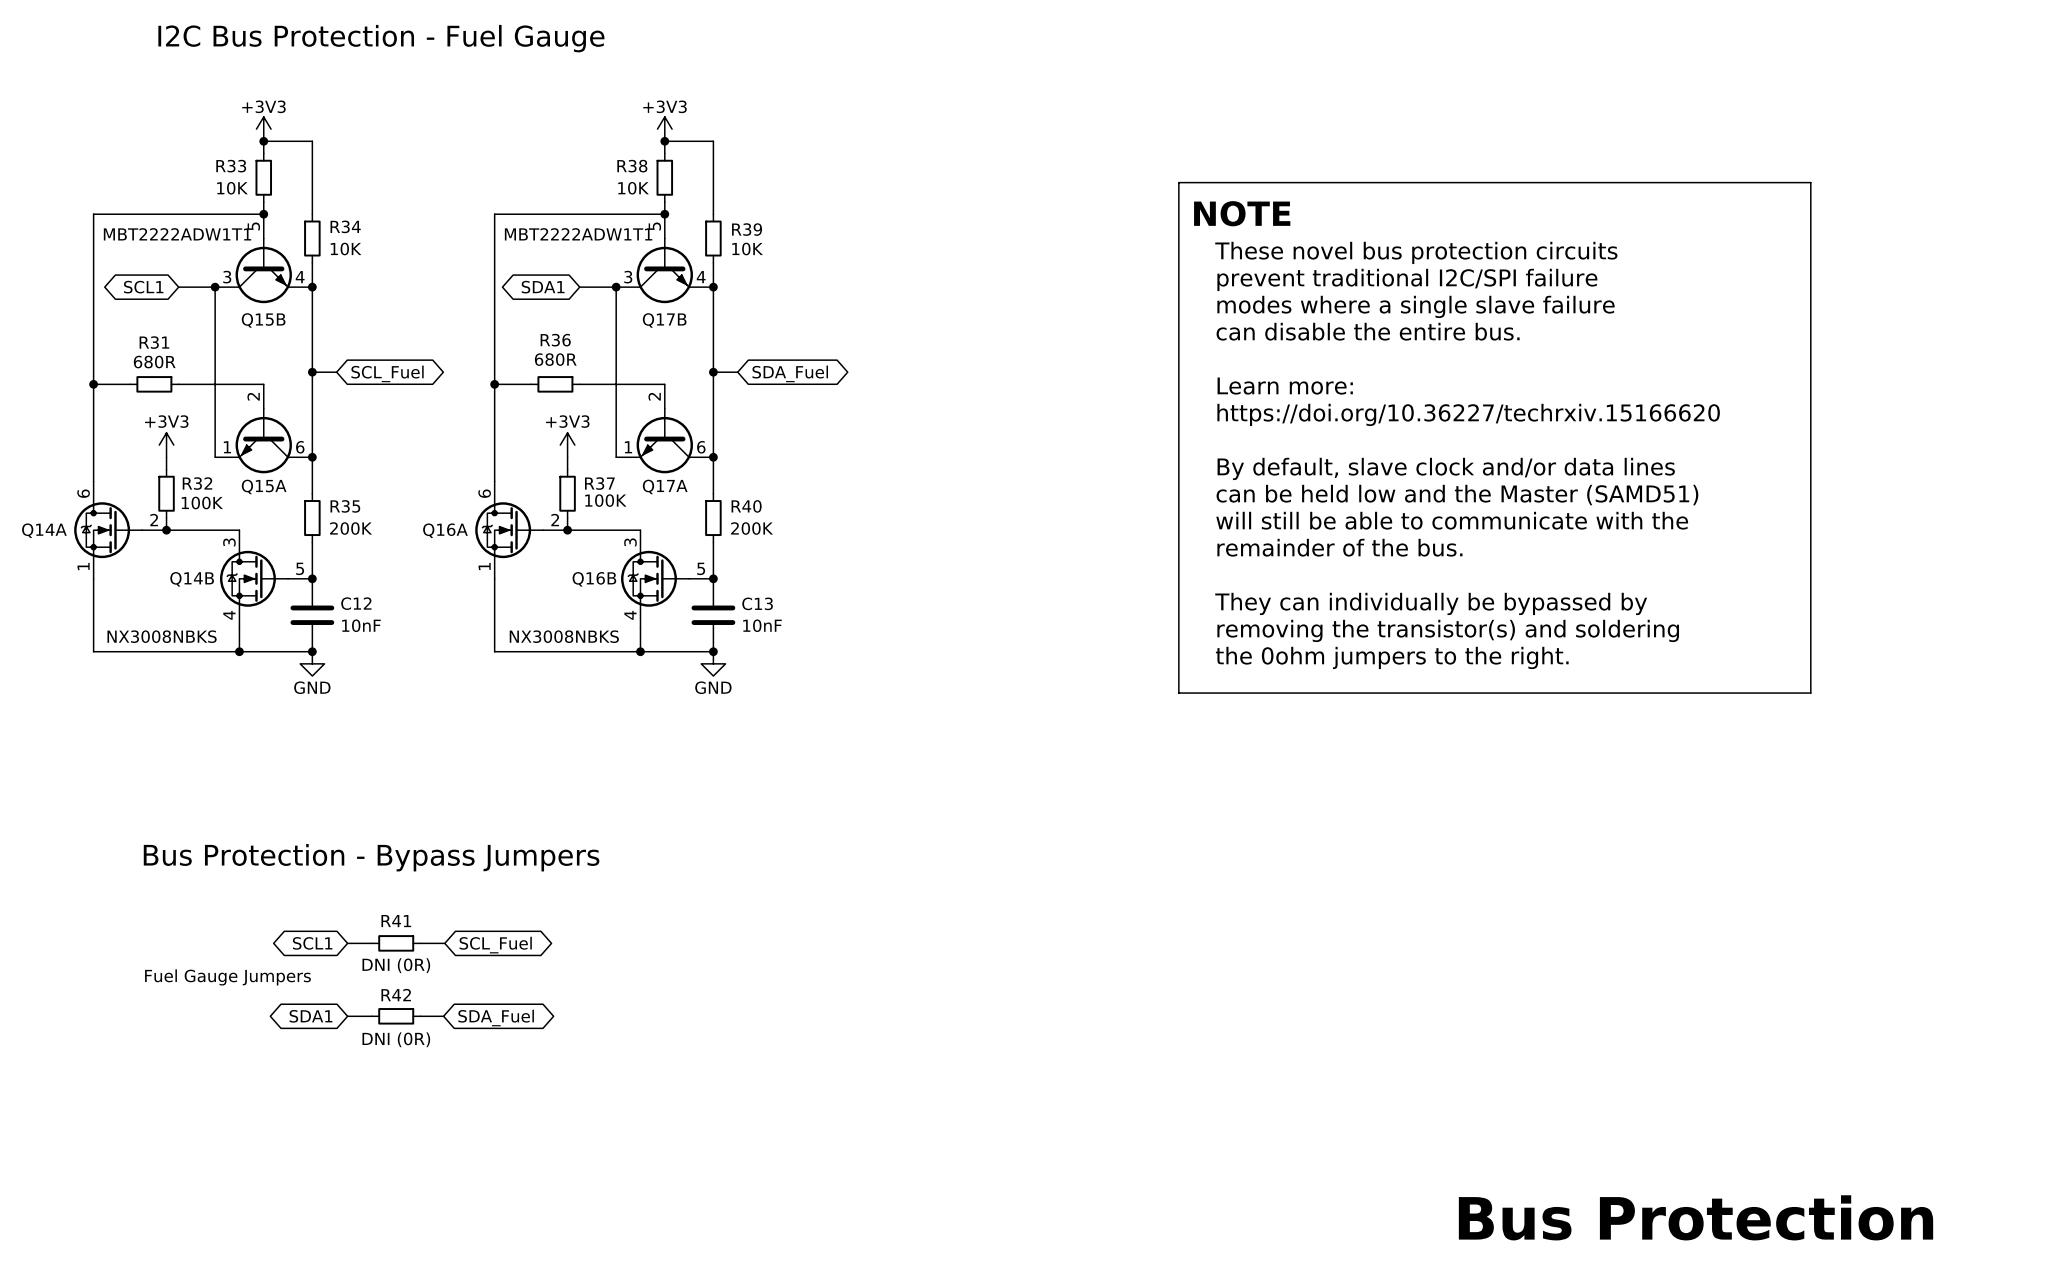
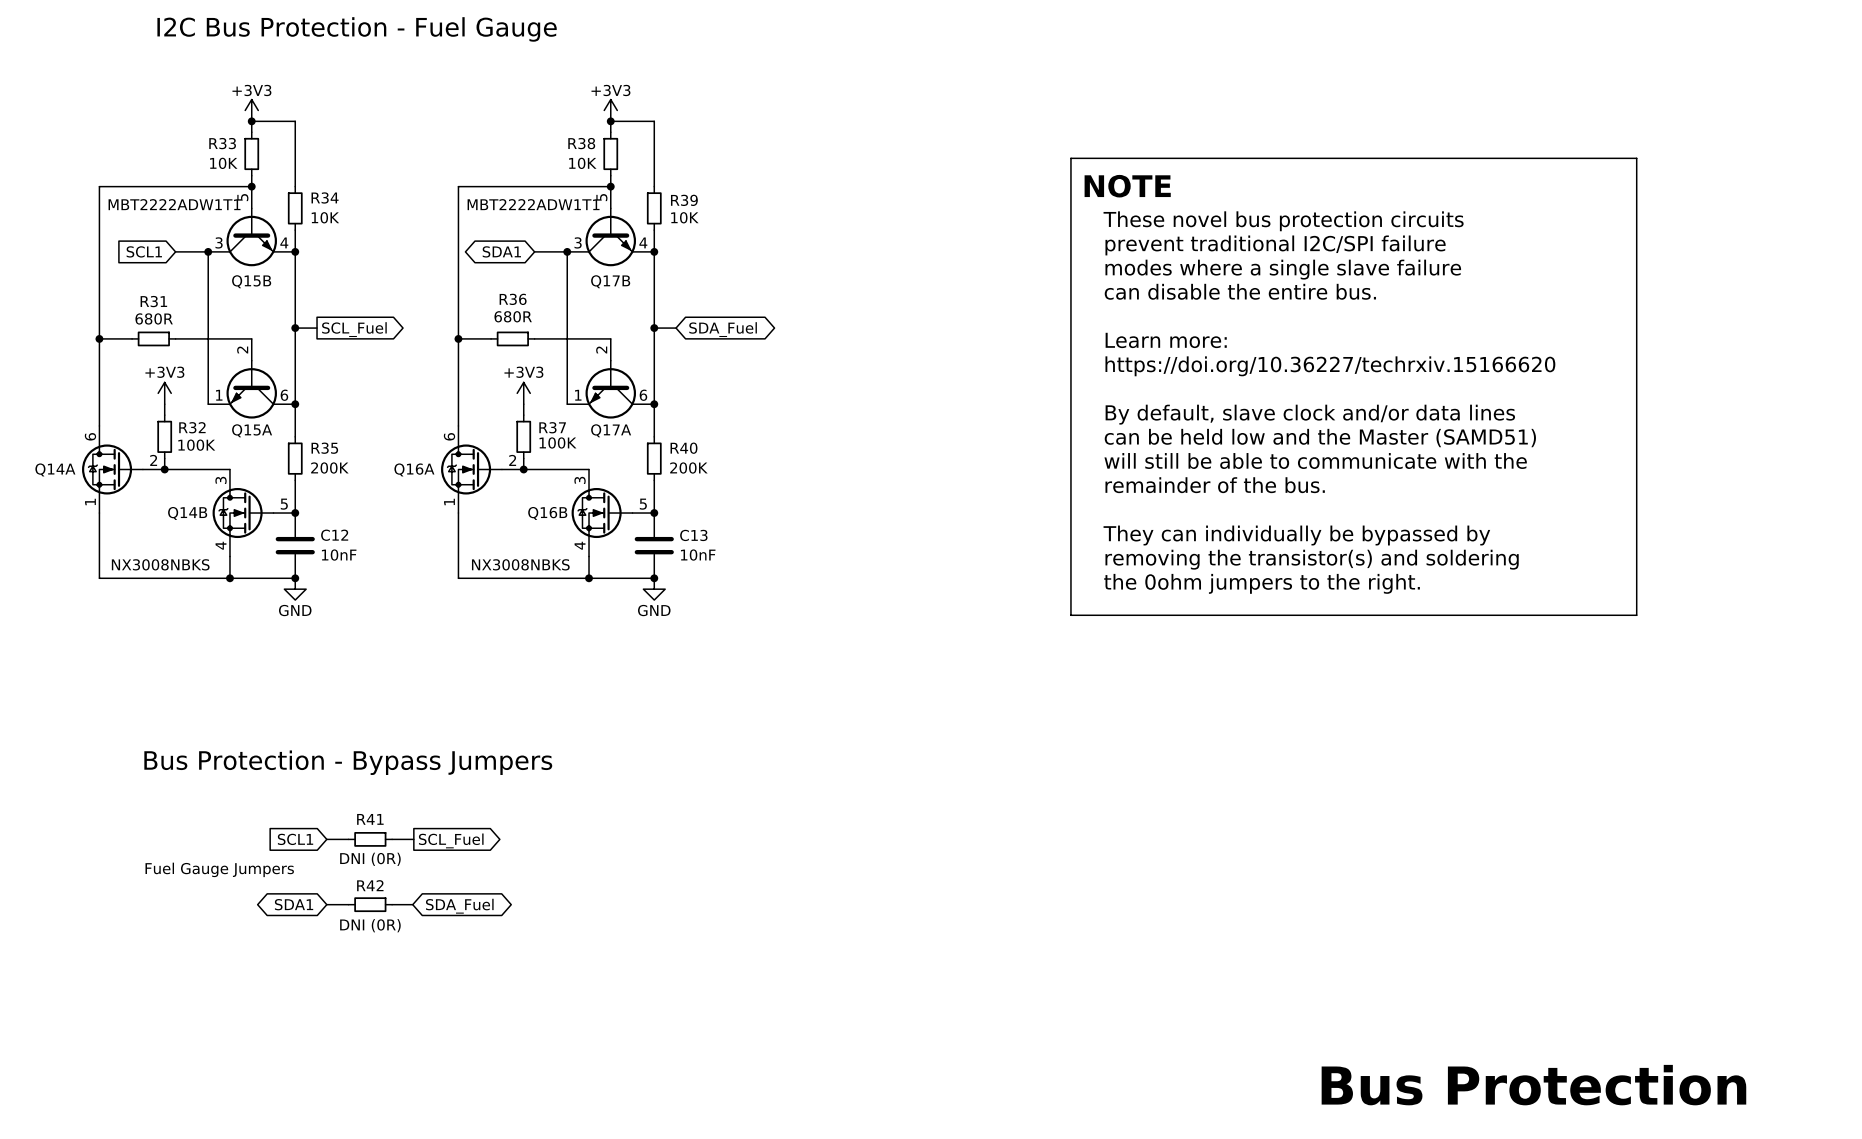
global label shape: bidirectional (143, 287) -> input (144, 251)
global label shape: bidirectional (387, 373) -> output (354, 329)
global label shape: bidirectional (312, 943) -> input (295, 839)
global label shape: bidirectional (495, 945) -> output (451, 840)

